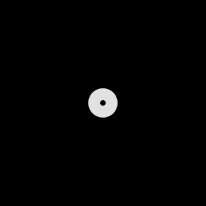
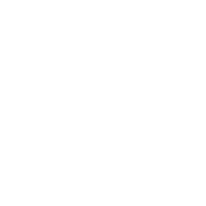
part: (102, 102) -> none

